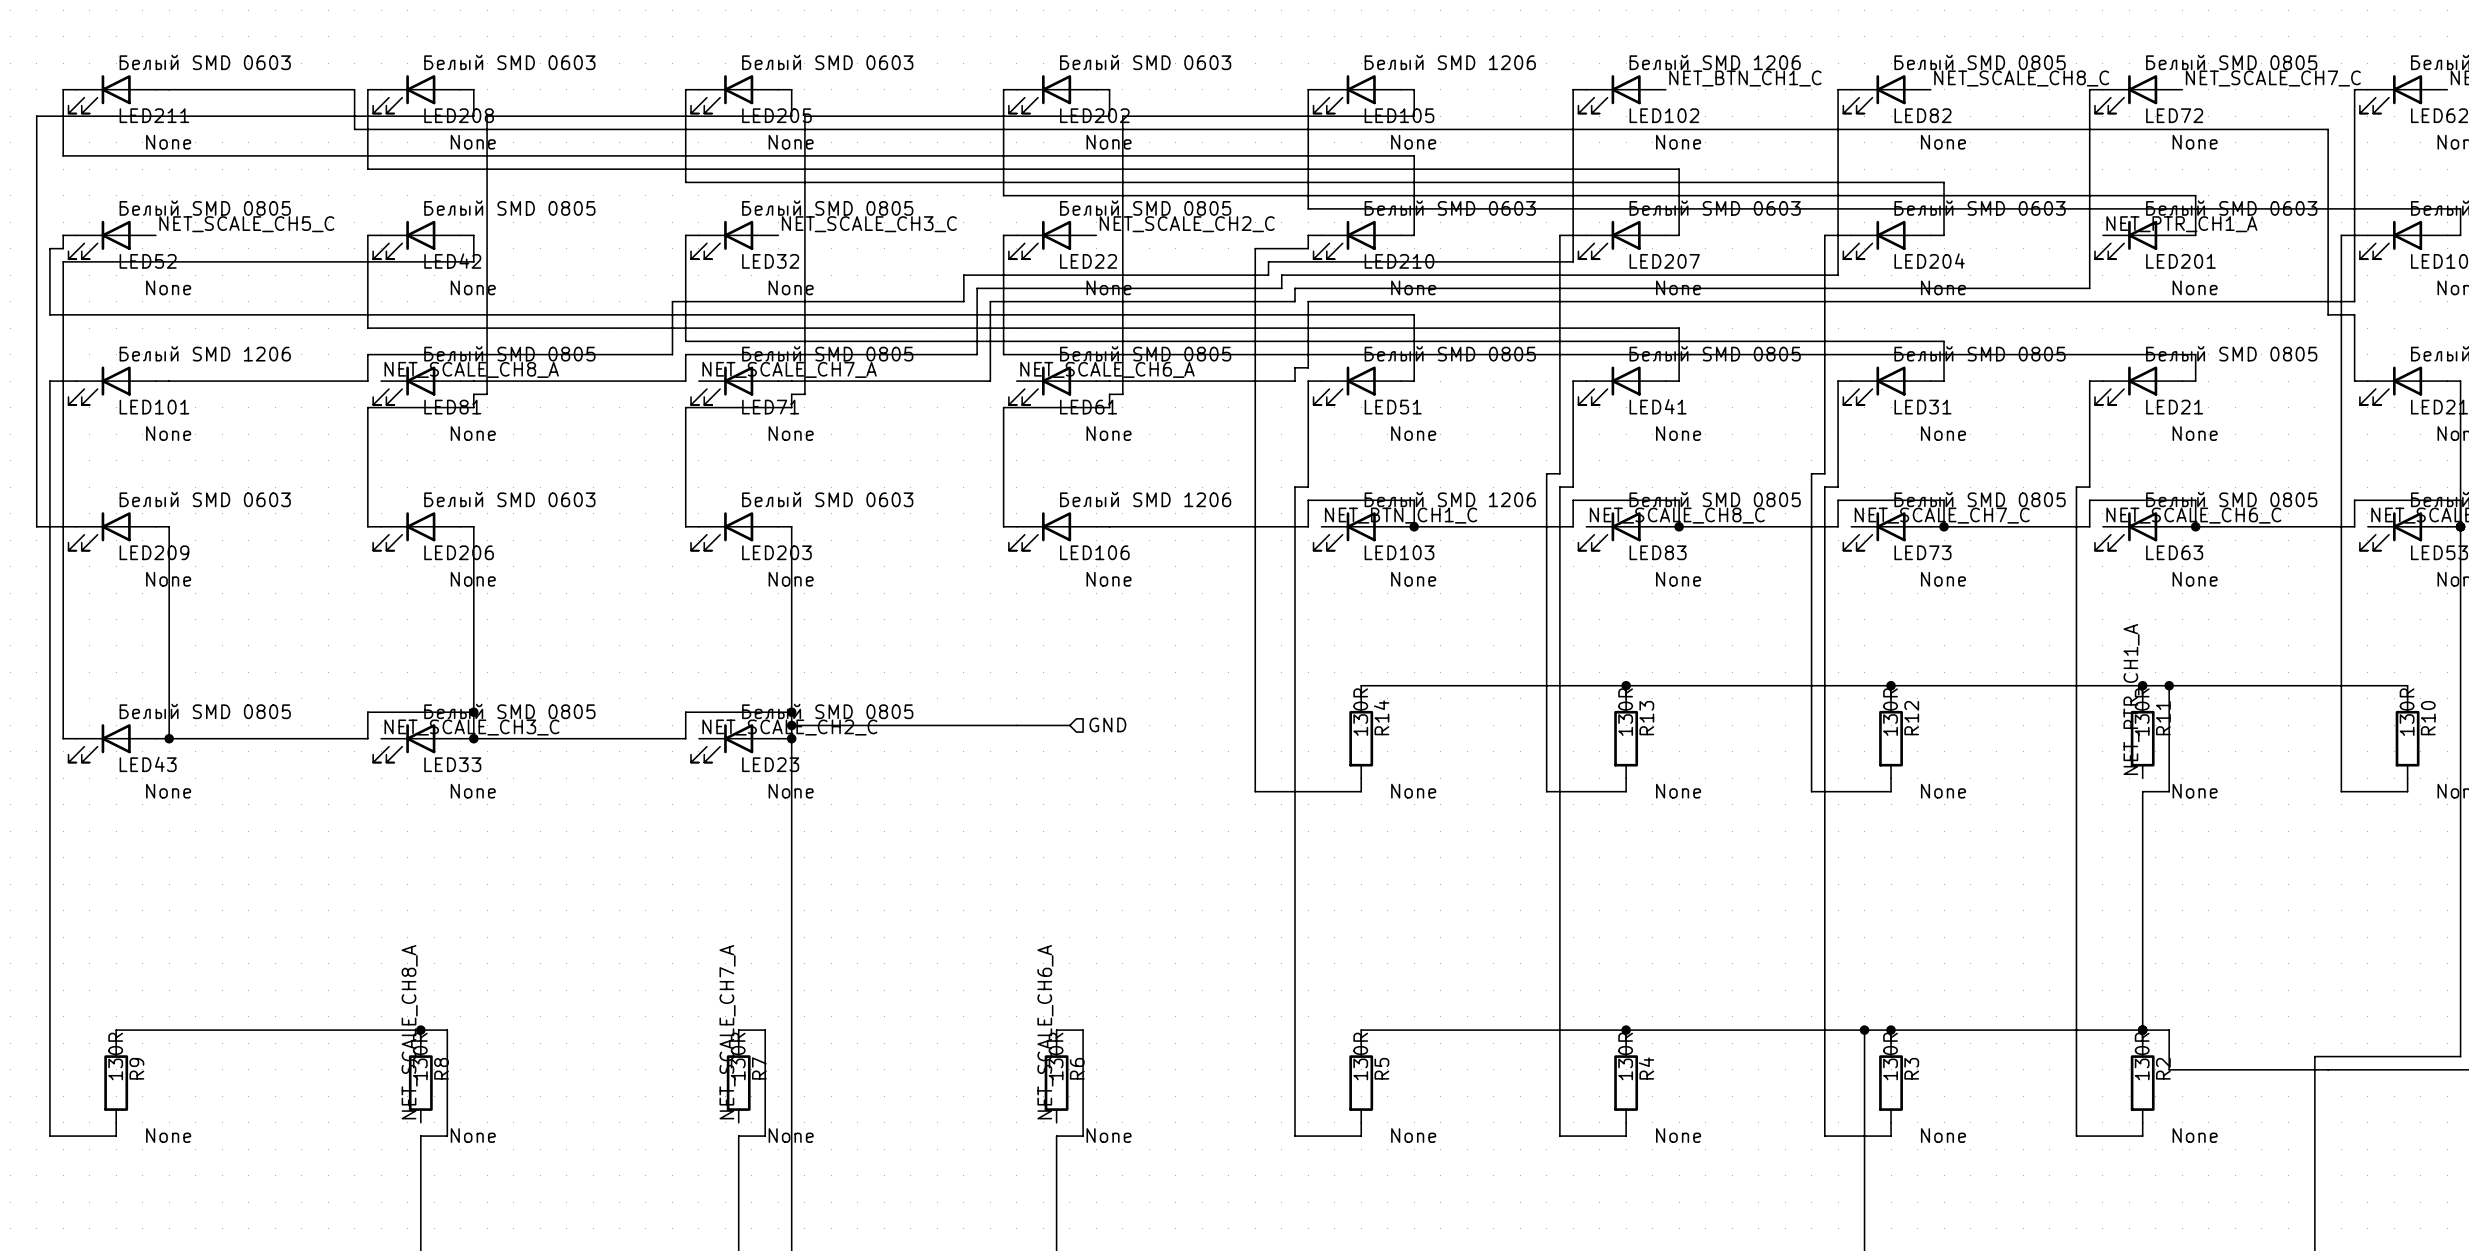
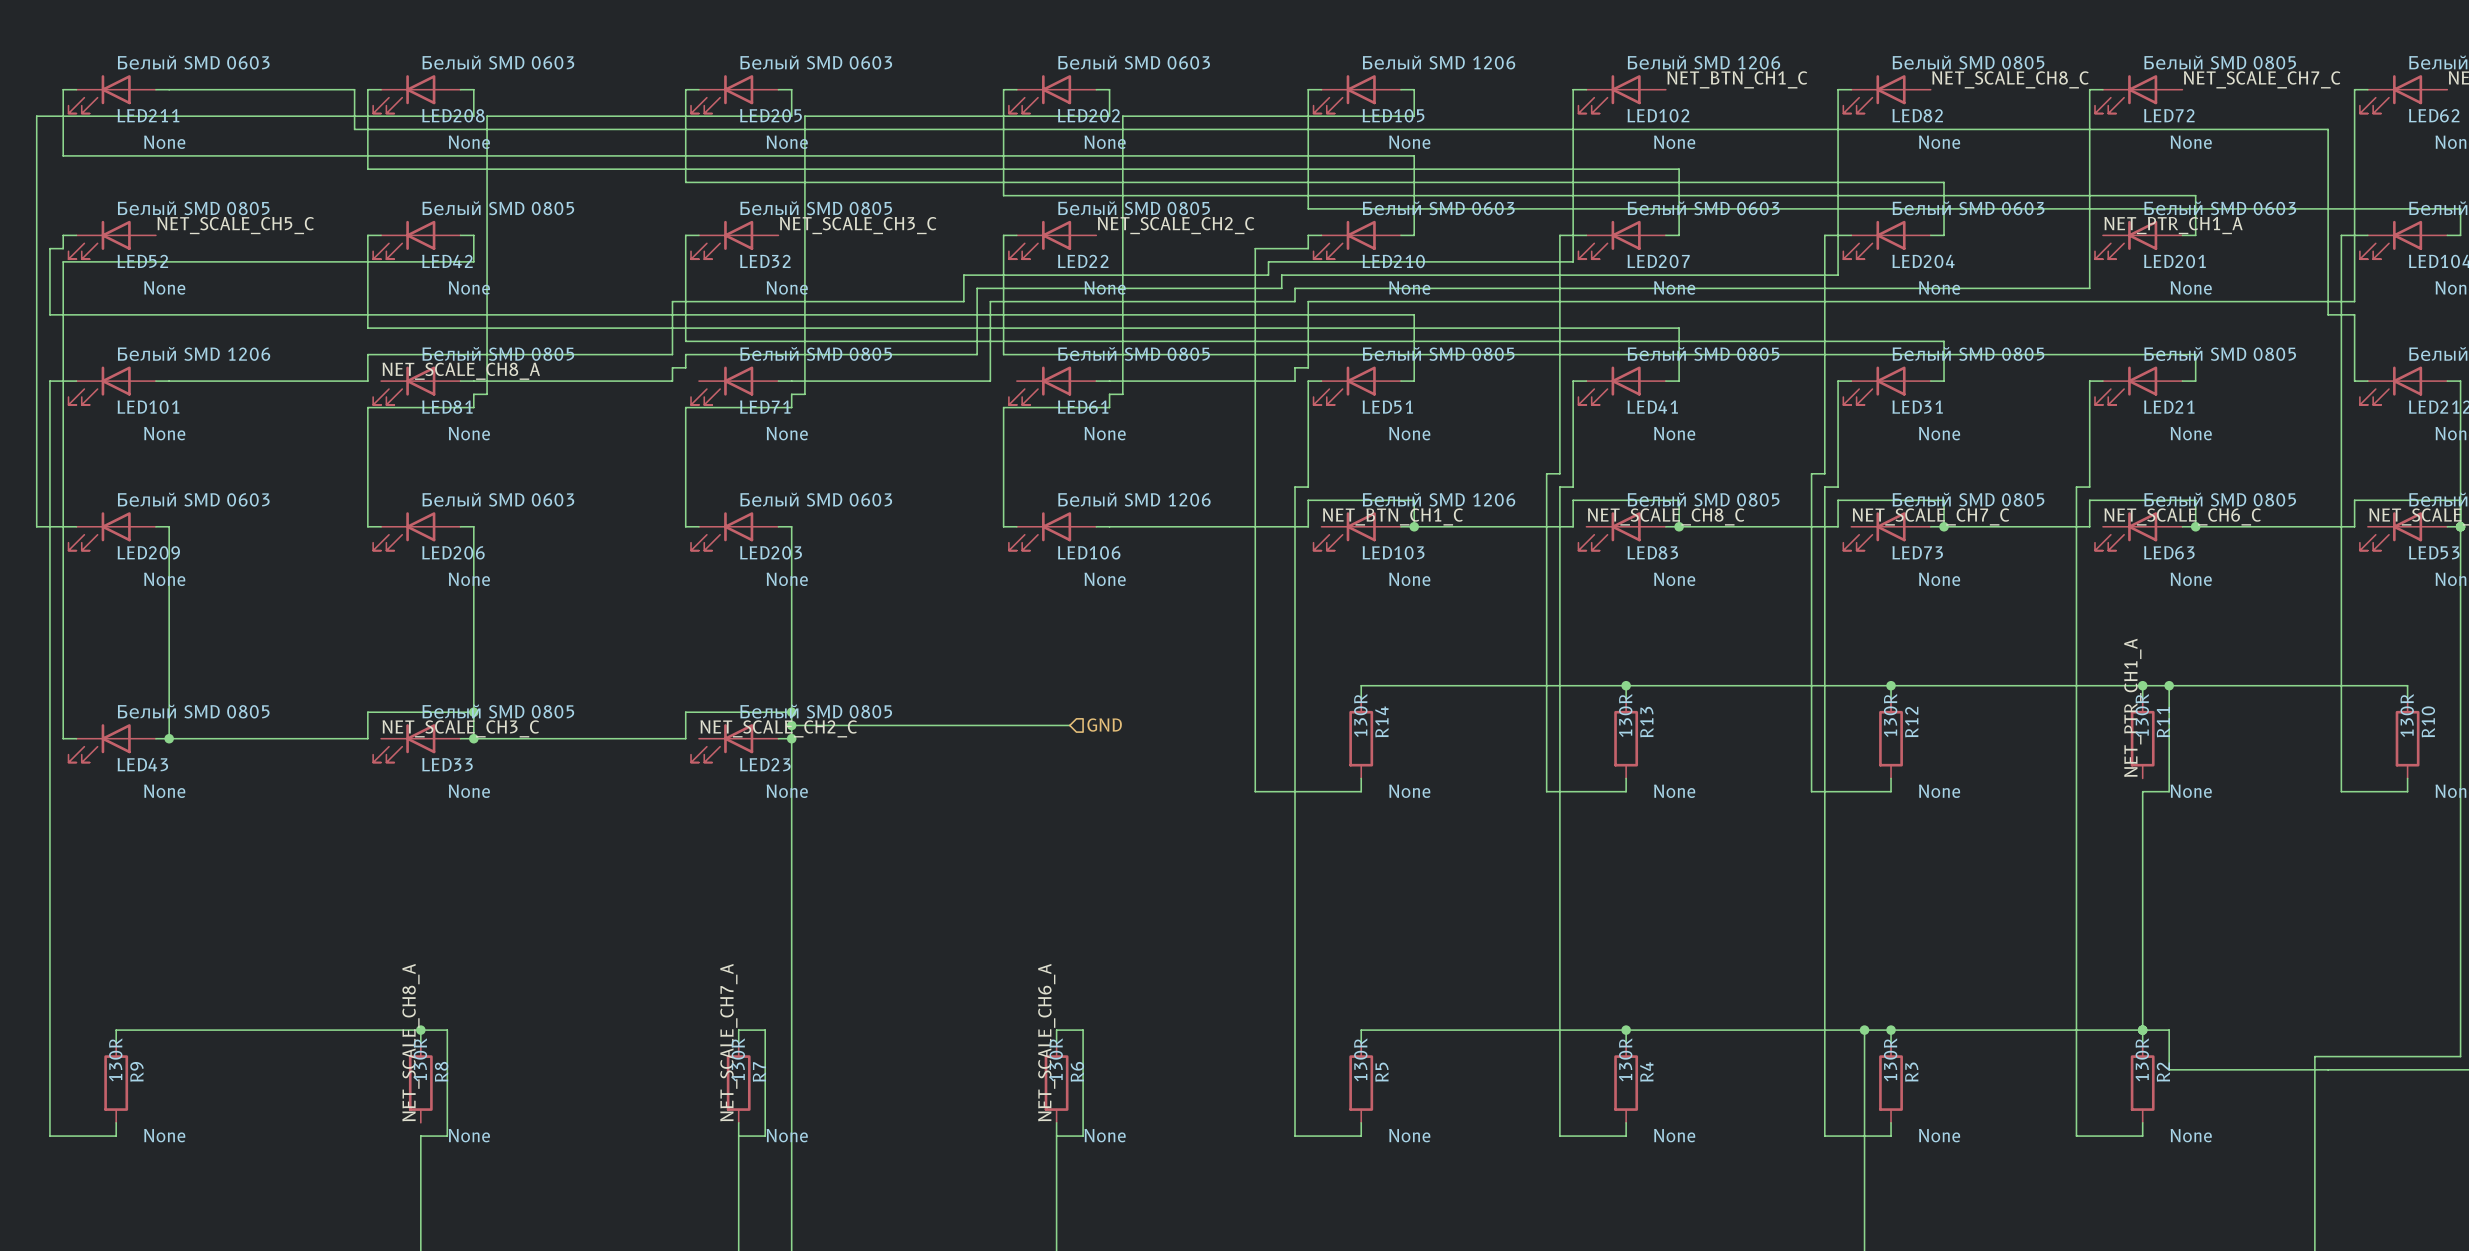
wire: (685, 367) (685, 381) (672, 381) -> (685, 367) (672, 367) (672, 381)
label: NET_SCALE_CH7_A (789, 369) -> none
label: NET_SCALE_CH6_A (1107, 369) -> none
wire: none -> (738, 1122) (738, 1136)
wire: none -> (1056, 1122) (1056, 1136)

